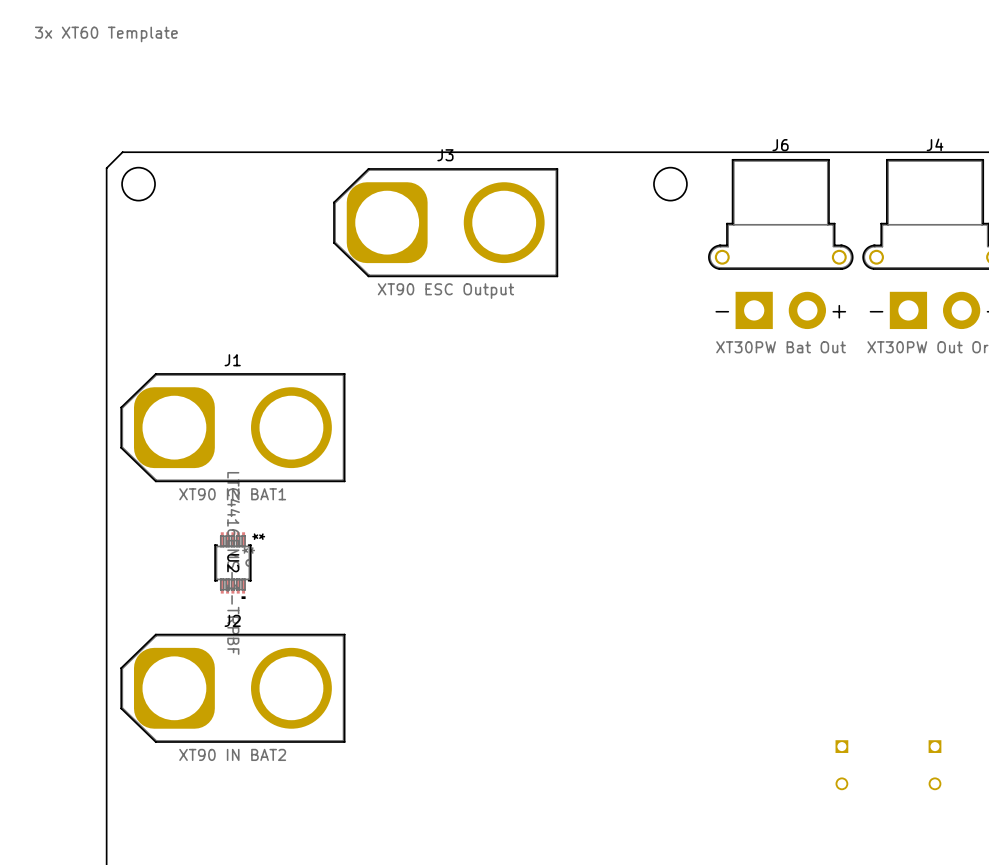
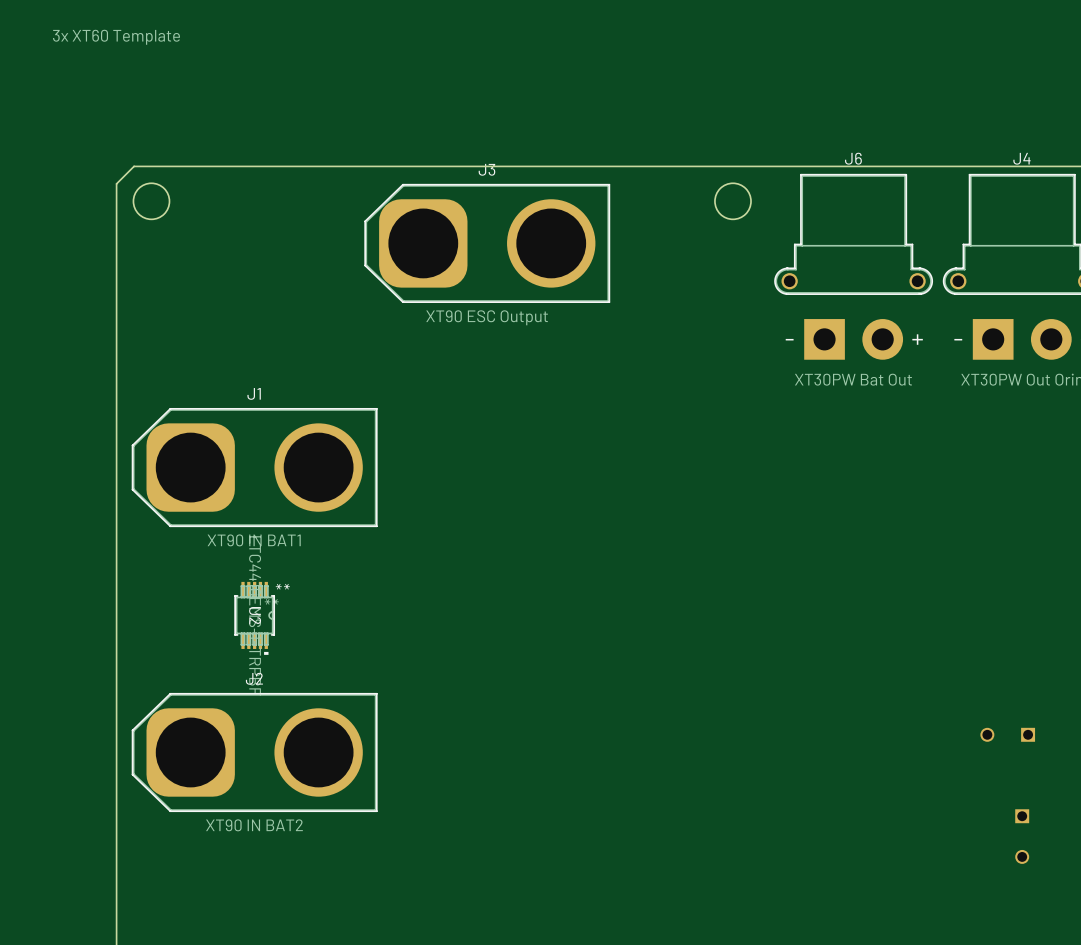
part rotation: 0° (841, 765) -> 90° clockwise (1007, 734)
part position: (841, 765) -> (1007, 734)

